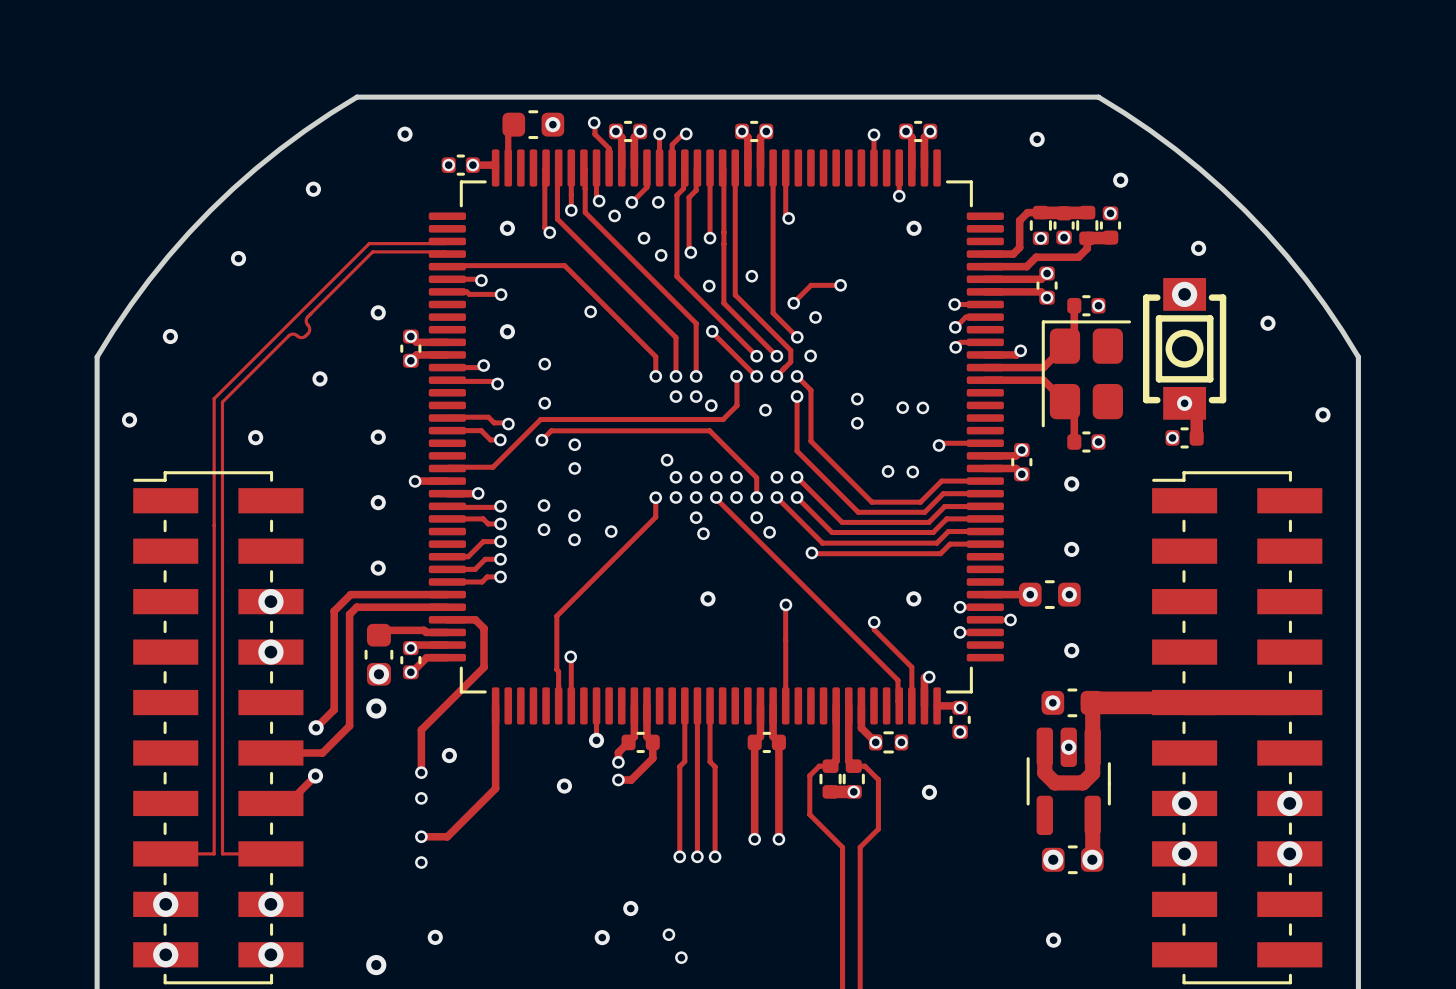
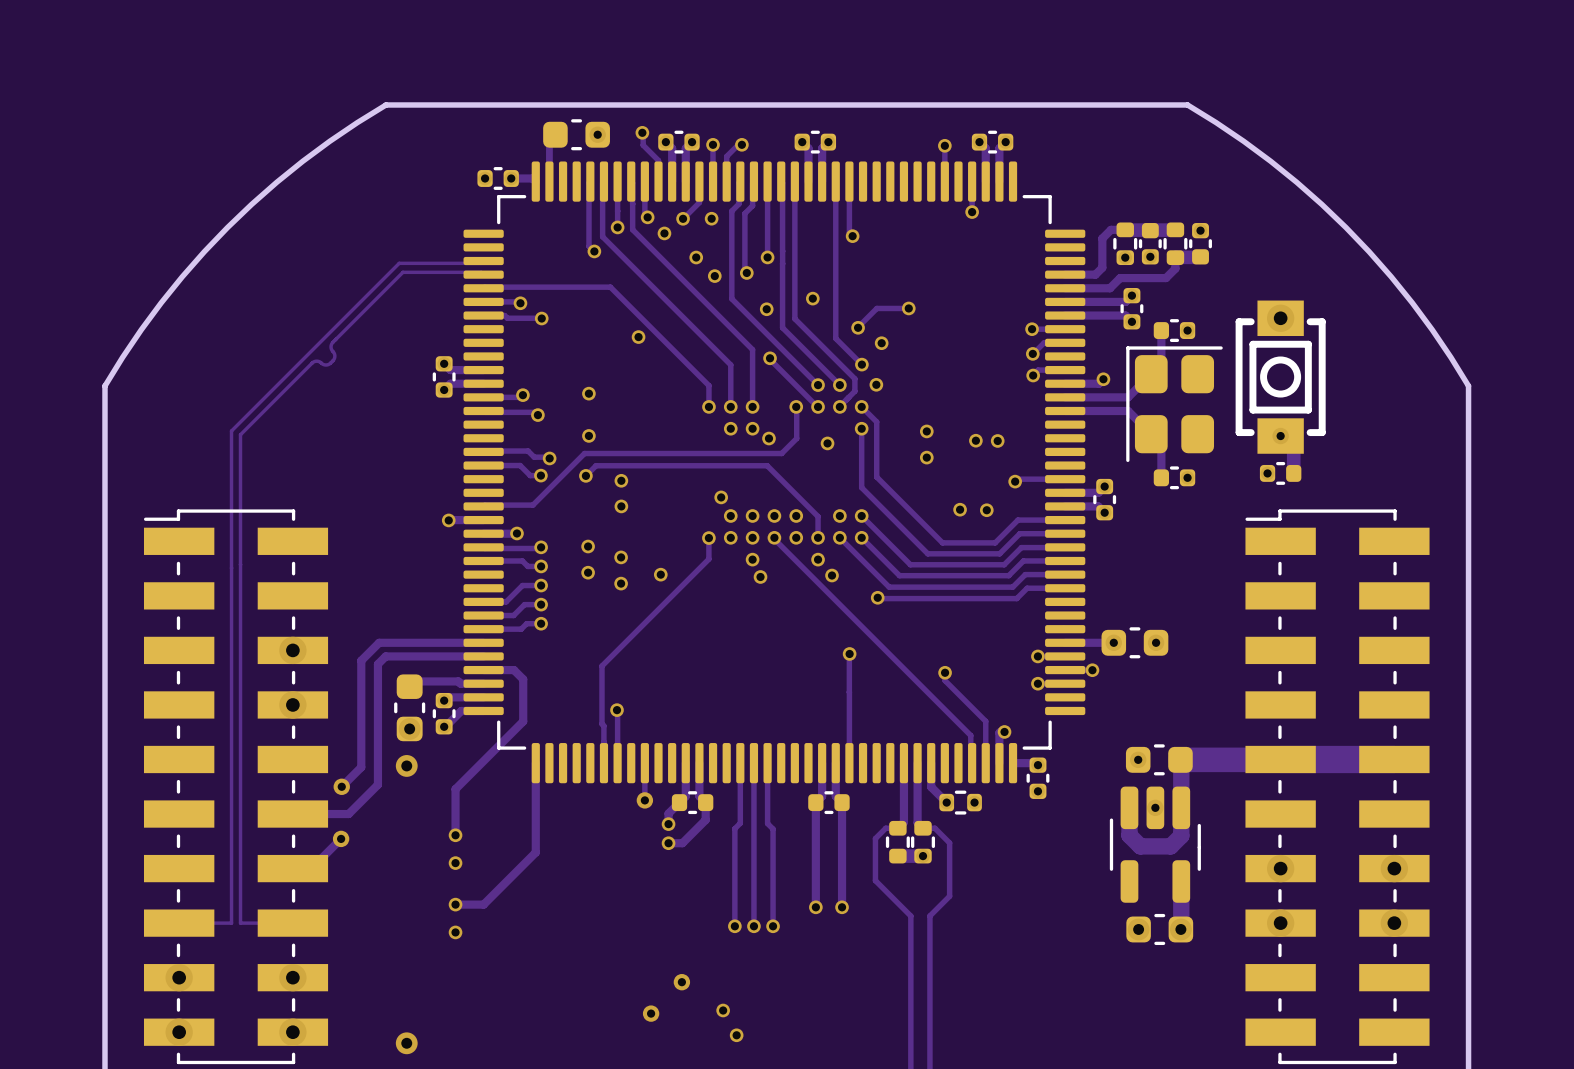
via: (405, 134) -> none
via: (1037, 139) -> none
via: (1120, 180) -> none
via: (313, 189) -> none
via: (507, 228) -> none
via: (914, 228) -> none
via: (1198, 248) -> none
via: (238, 258) -> none
via: (378, 312) -> none
via: (1267, 323) -> none
via: (507, 331) -> none
via: (170, 336) -> none
via: (319, 378) -> none
via: (1322, 414) -> none
via: (129, 420) -> none
via: (255, 437) -> none
via: (378, 437) -> none
via: (1071, 483) -> none
via: (378, 502) -> none
via: (1071, 549) -> none
via: (378, 568) -> none
via: (707, 598) -> none
via: (913, 598) -> none
via: (1071, 650) -> none
via: (449, 755) -> none
via: (564, 786) -> none
via: (929, 792) -> none
via: (435, 937) -> none
via: (1053, 940) -> none

